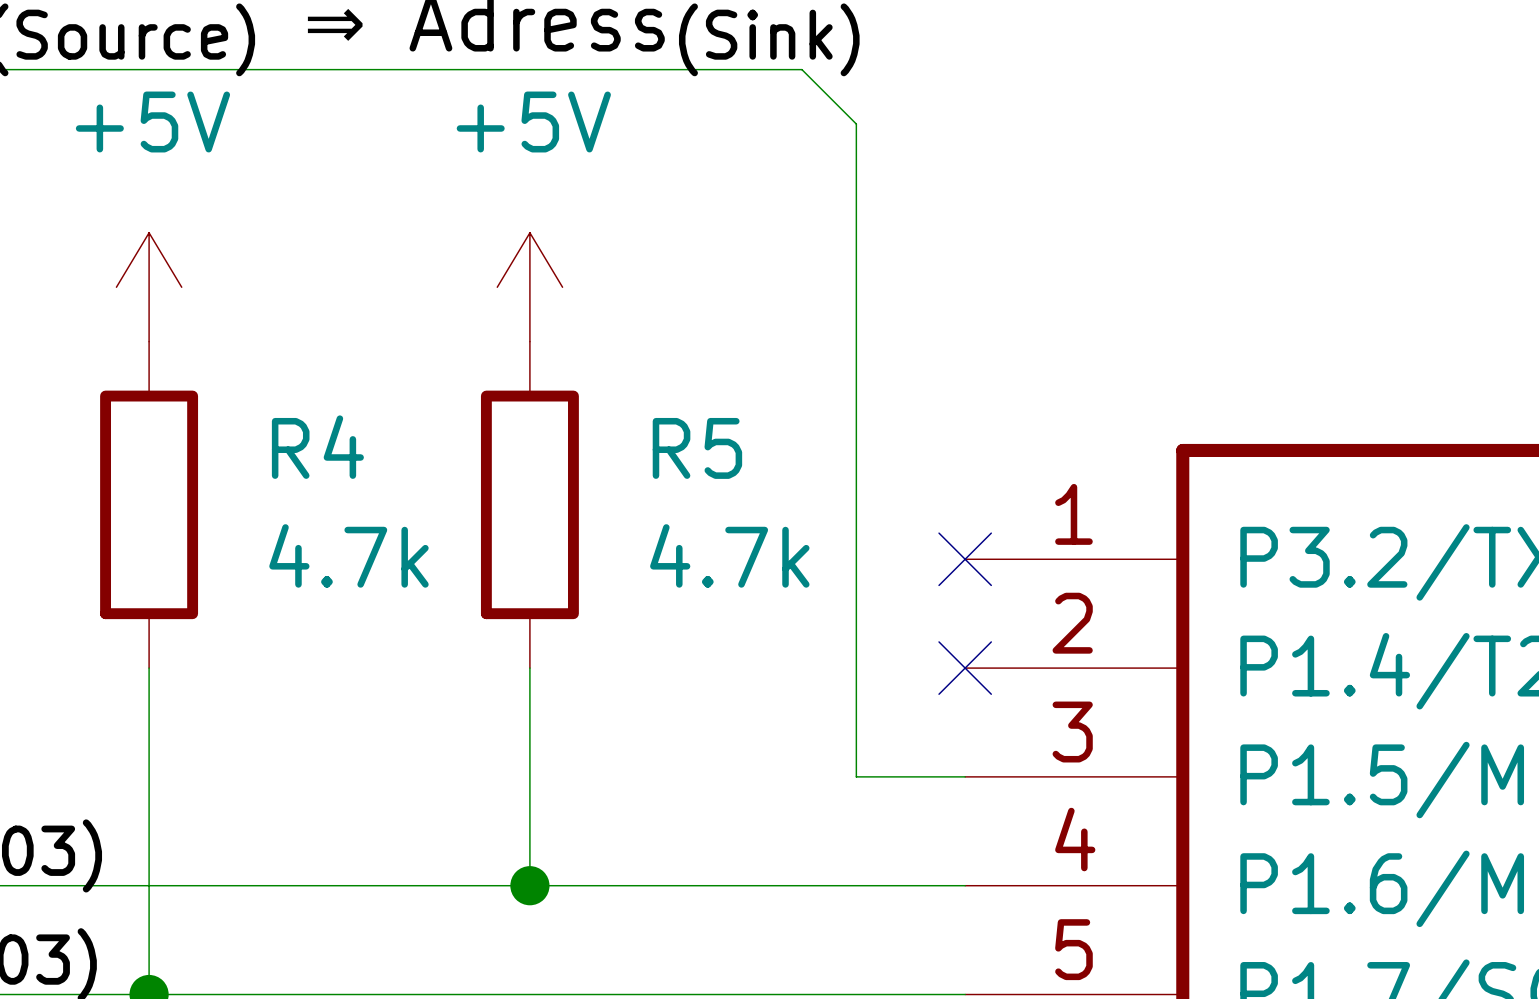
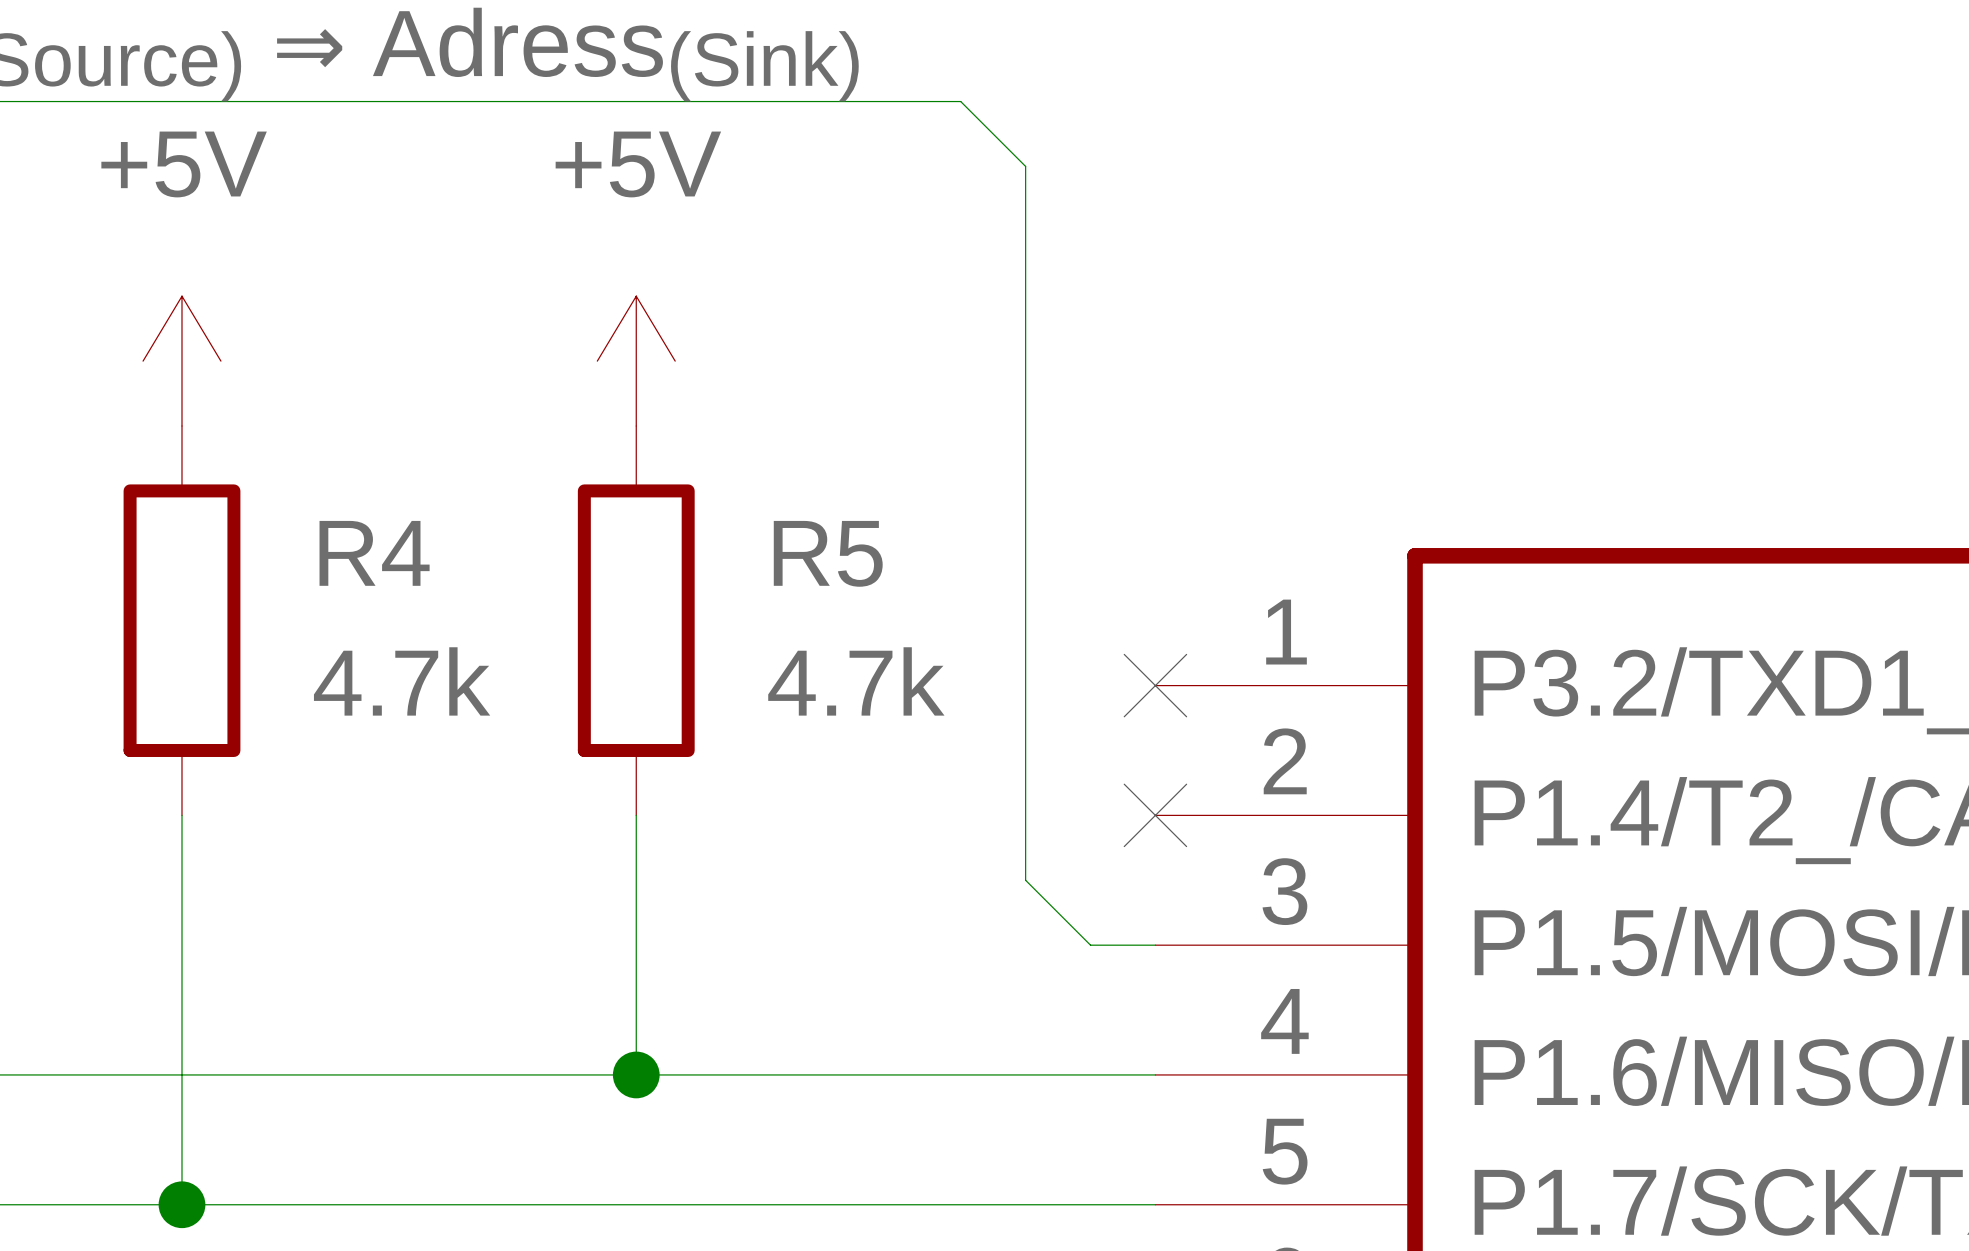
wire: (856, 722) (856, 776) (910, 776) -> (1025, 880) (1090, 945)

